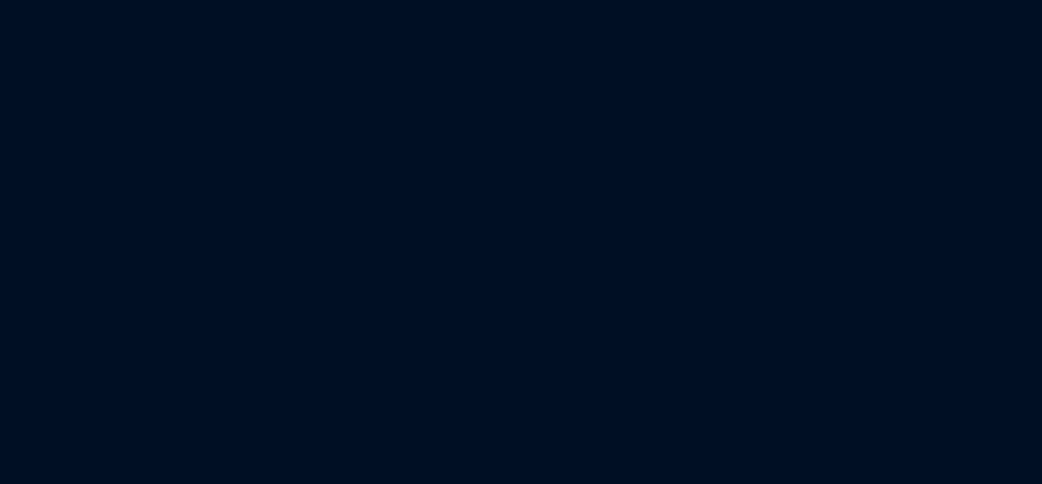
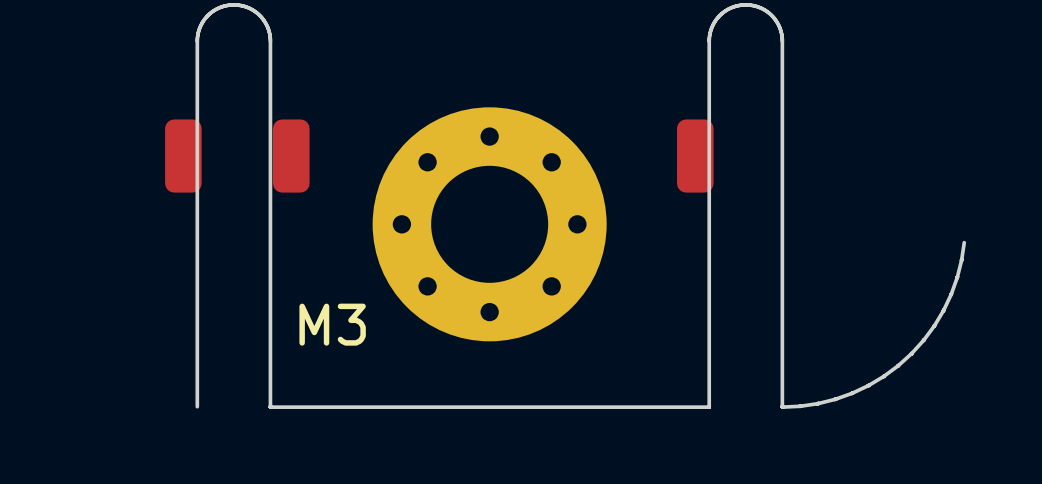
board edge: none -> (233, 4) (221, 7) (209, 14) (201, 24) (197, 37) (197, 406)
board edge: none -> (234, 4) (246, 7) (258, 14) (266, 24) (270, 37) (270, 406)
board edge: none -> (745, 4) (733, 7) (721, 14) (713, 24) (709, 37) (709, 406)
board edge: none -> (746, 4) (758, 7) (770, 14) (778, 24) (782, 37) (782, 406)
part: none -> (183, 156)
part: none -> (291, 156)
part: none -> (695, 156)
M3: none -> (489, 224)
board edge: none -> (964, 242) (961, 259)
board edge: none -> (961, 260) (957, 276)
board edge: none -> (957, 277) (951, 293)
board edge: none -> (951, 294) (943, 310)
board edge: none -> (943, 310) (934, 325)
board edge: none -> (934, 326) (923, 339)
board edge: none -> (923, 340) (911, 353)
board edge: none -> (911, 353) (898, 365)
board edge: none -> (897, 365) (884, 376)
board edge: none -> (883, 376) (868, 385)
board edge: none -> (868, 385) (852, 393)
board edge: none -> (851, 393) (835, 399)
board edge: none -> (834, 399) (818, 403)
board edge: none -> (817, 403) (800, 406)
board edge: none -> (799, 406) (782, 407)
board edge: none -> (270, 407) (708, 407)

